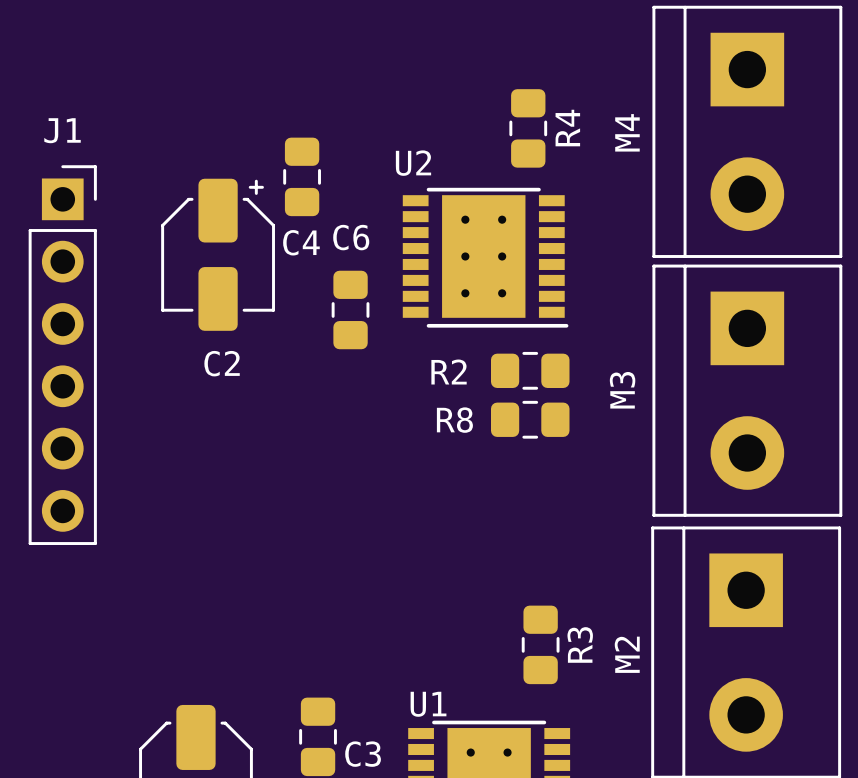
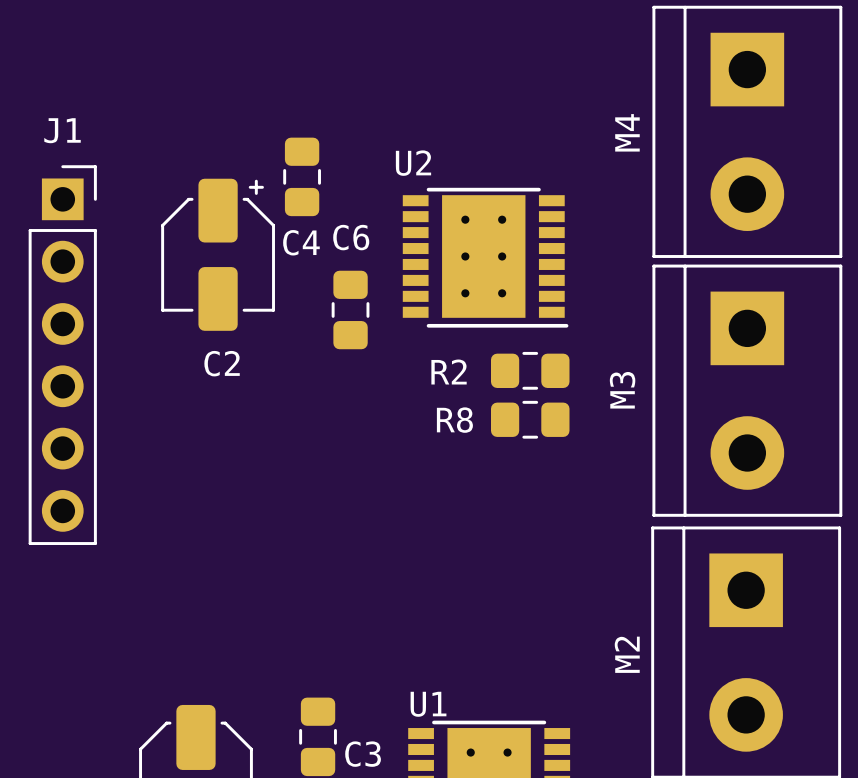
R4: (528, 128) -> none
R3: (540, 644) -> none

